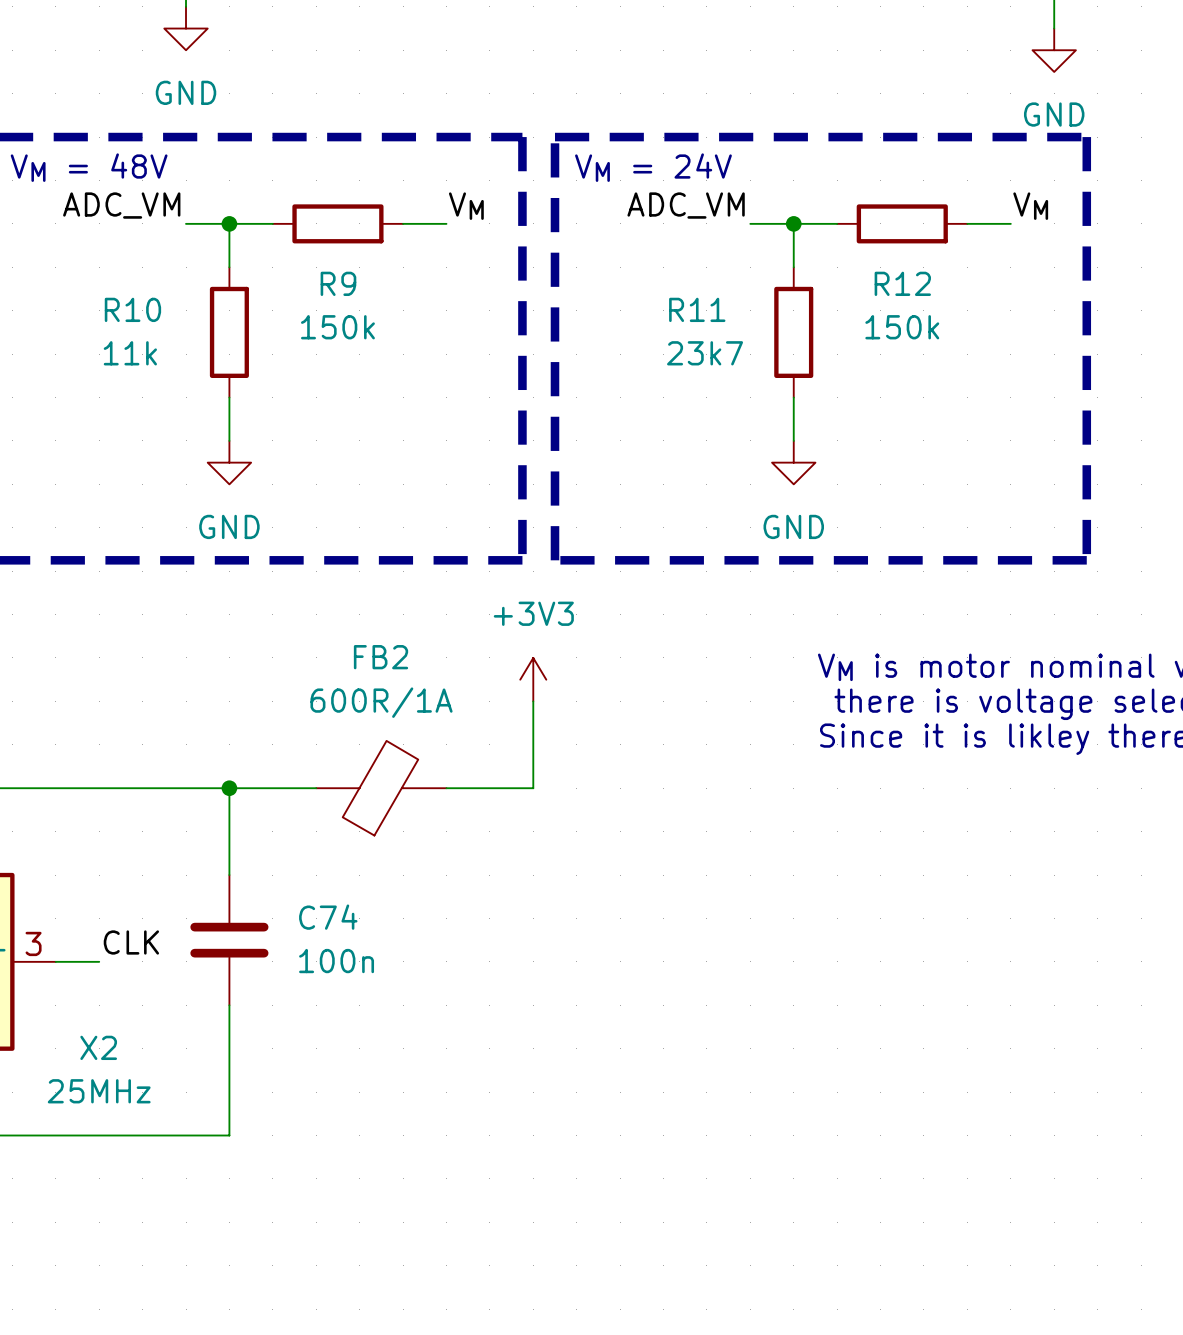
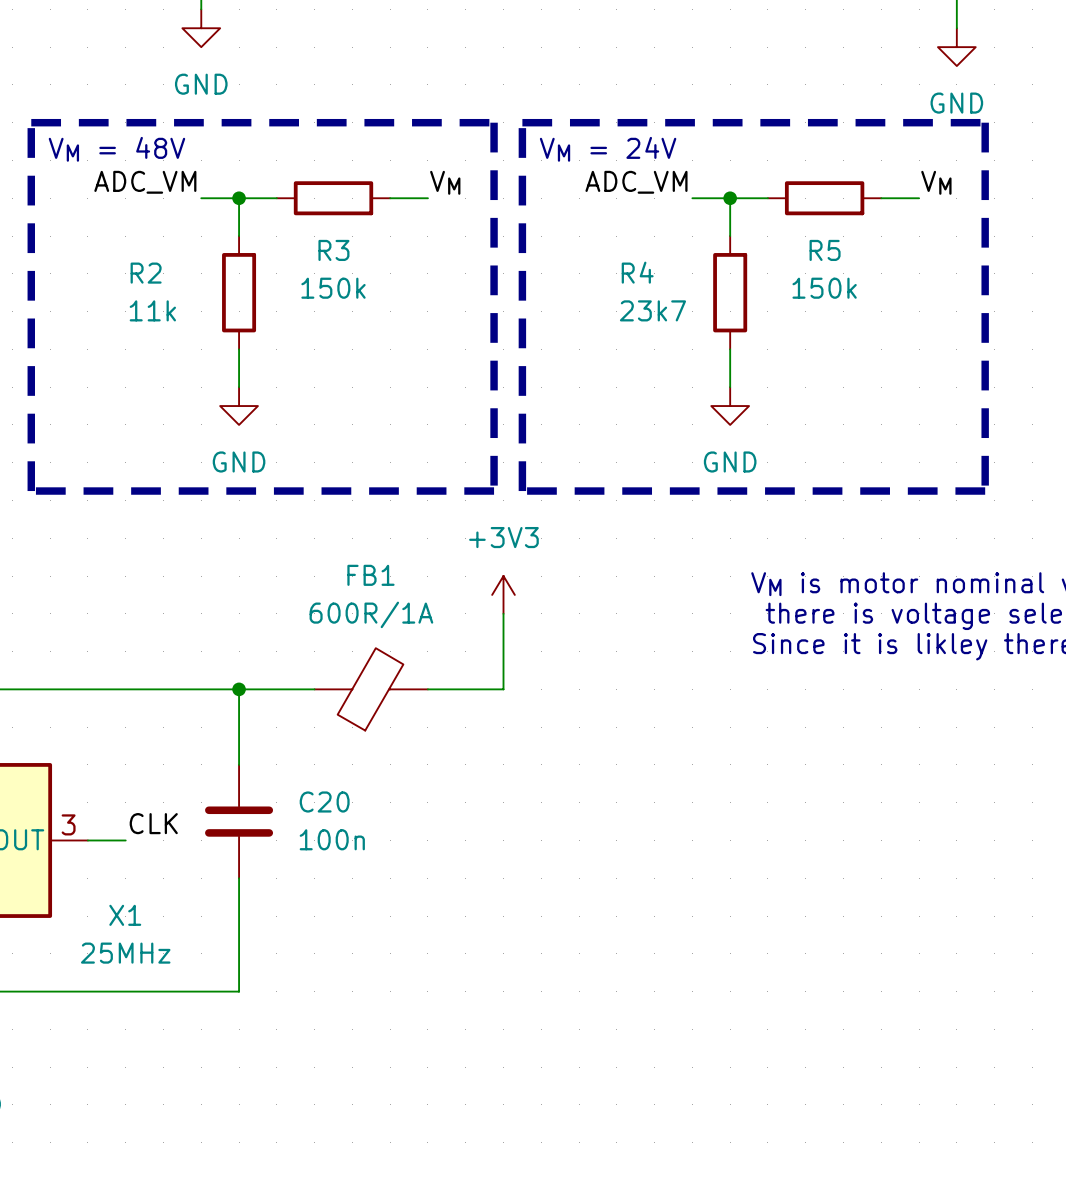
R9 name: R9 (338, 283) -> R3 (333, 250)
R12 name: R12 (902, 283) -> R5 (825, 250)
R10 name: R10 (132, 309) -> R2 (146, 273)
R11 name: R11 (697, 309) -> R4 (637, 272)
FB2 name: FB2 (381, 657) -> FB1 (370, 575)
C74 name: C74 (328, 917) -> C20 (324, 802)
X2 name: X2 (98, 1047) -> X1 (125, 915)

